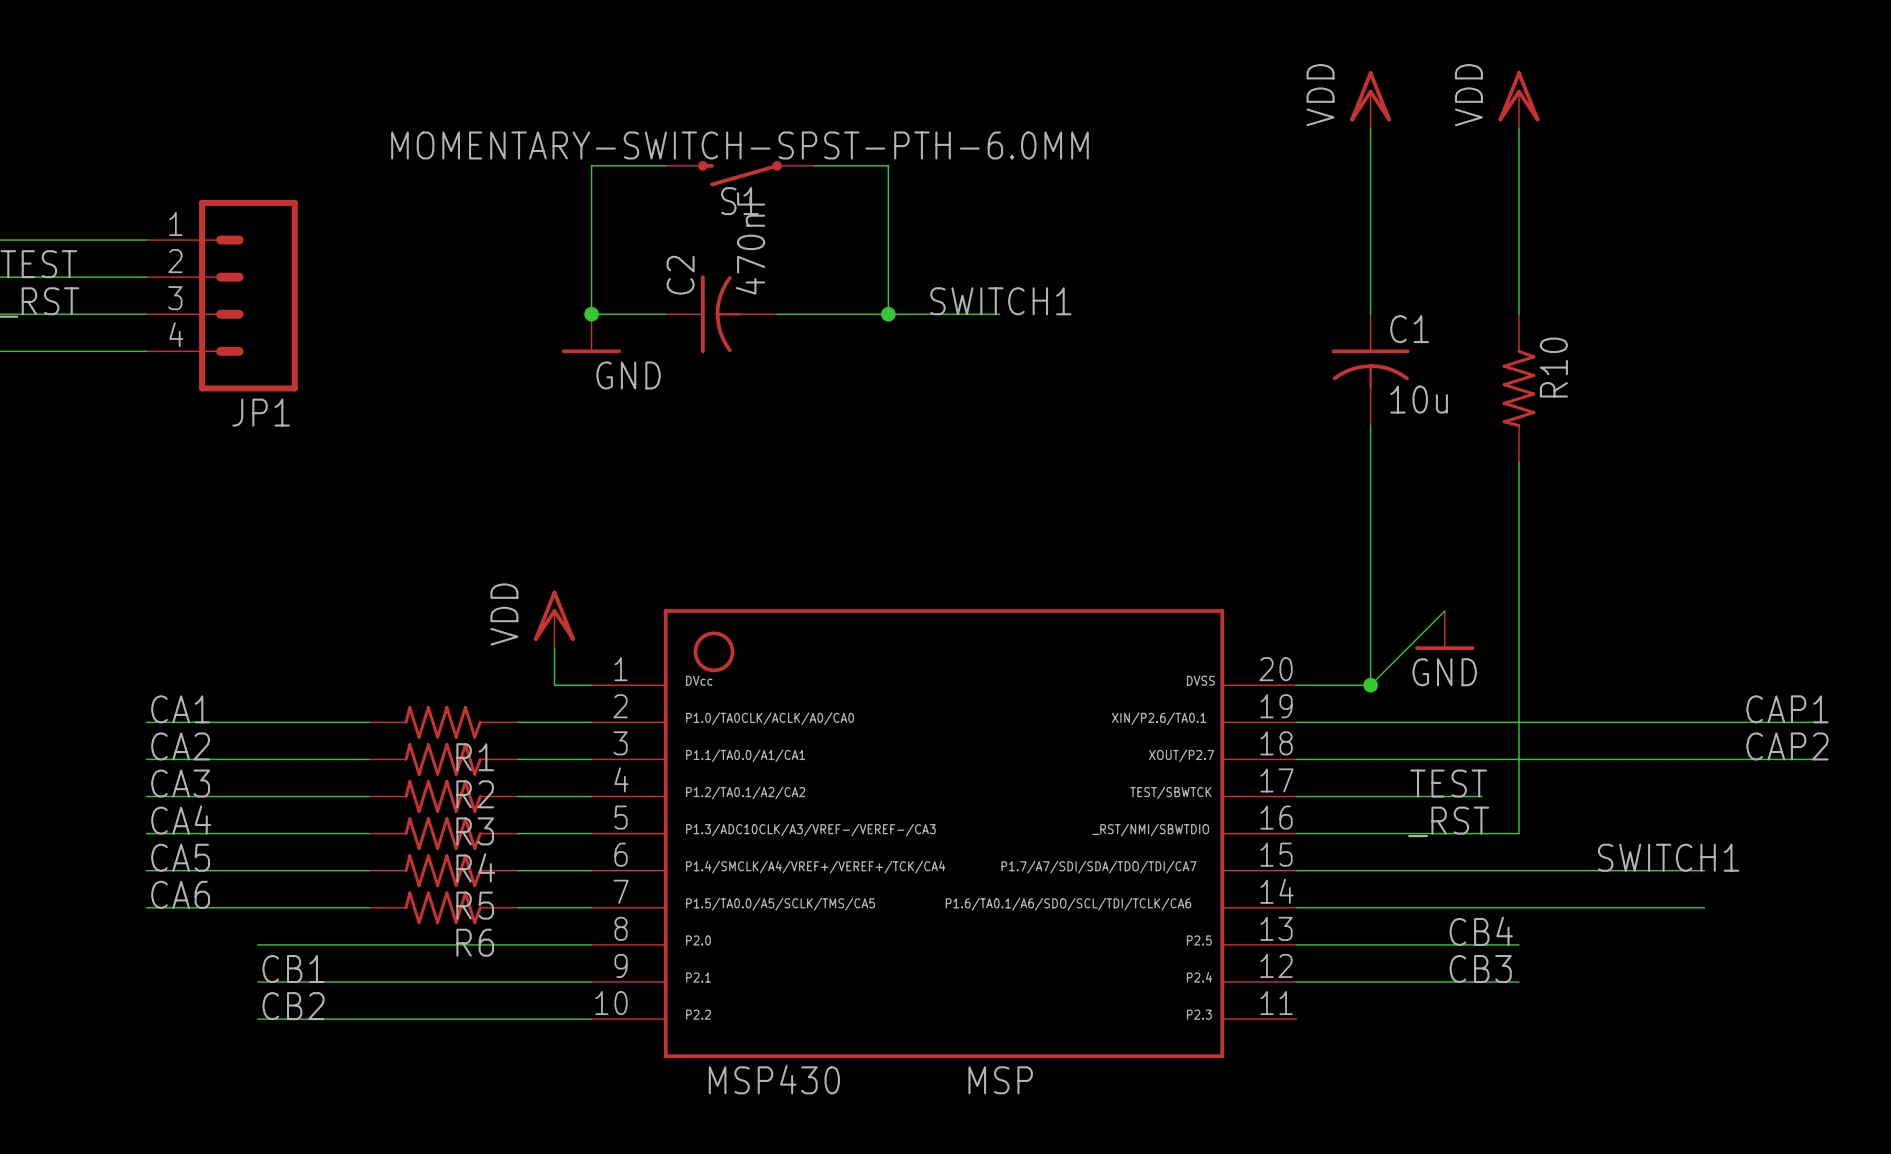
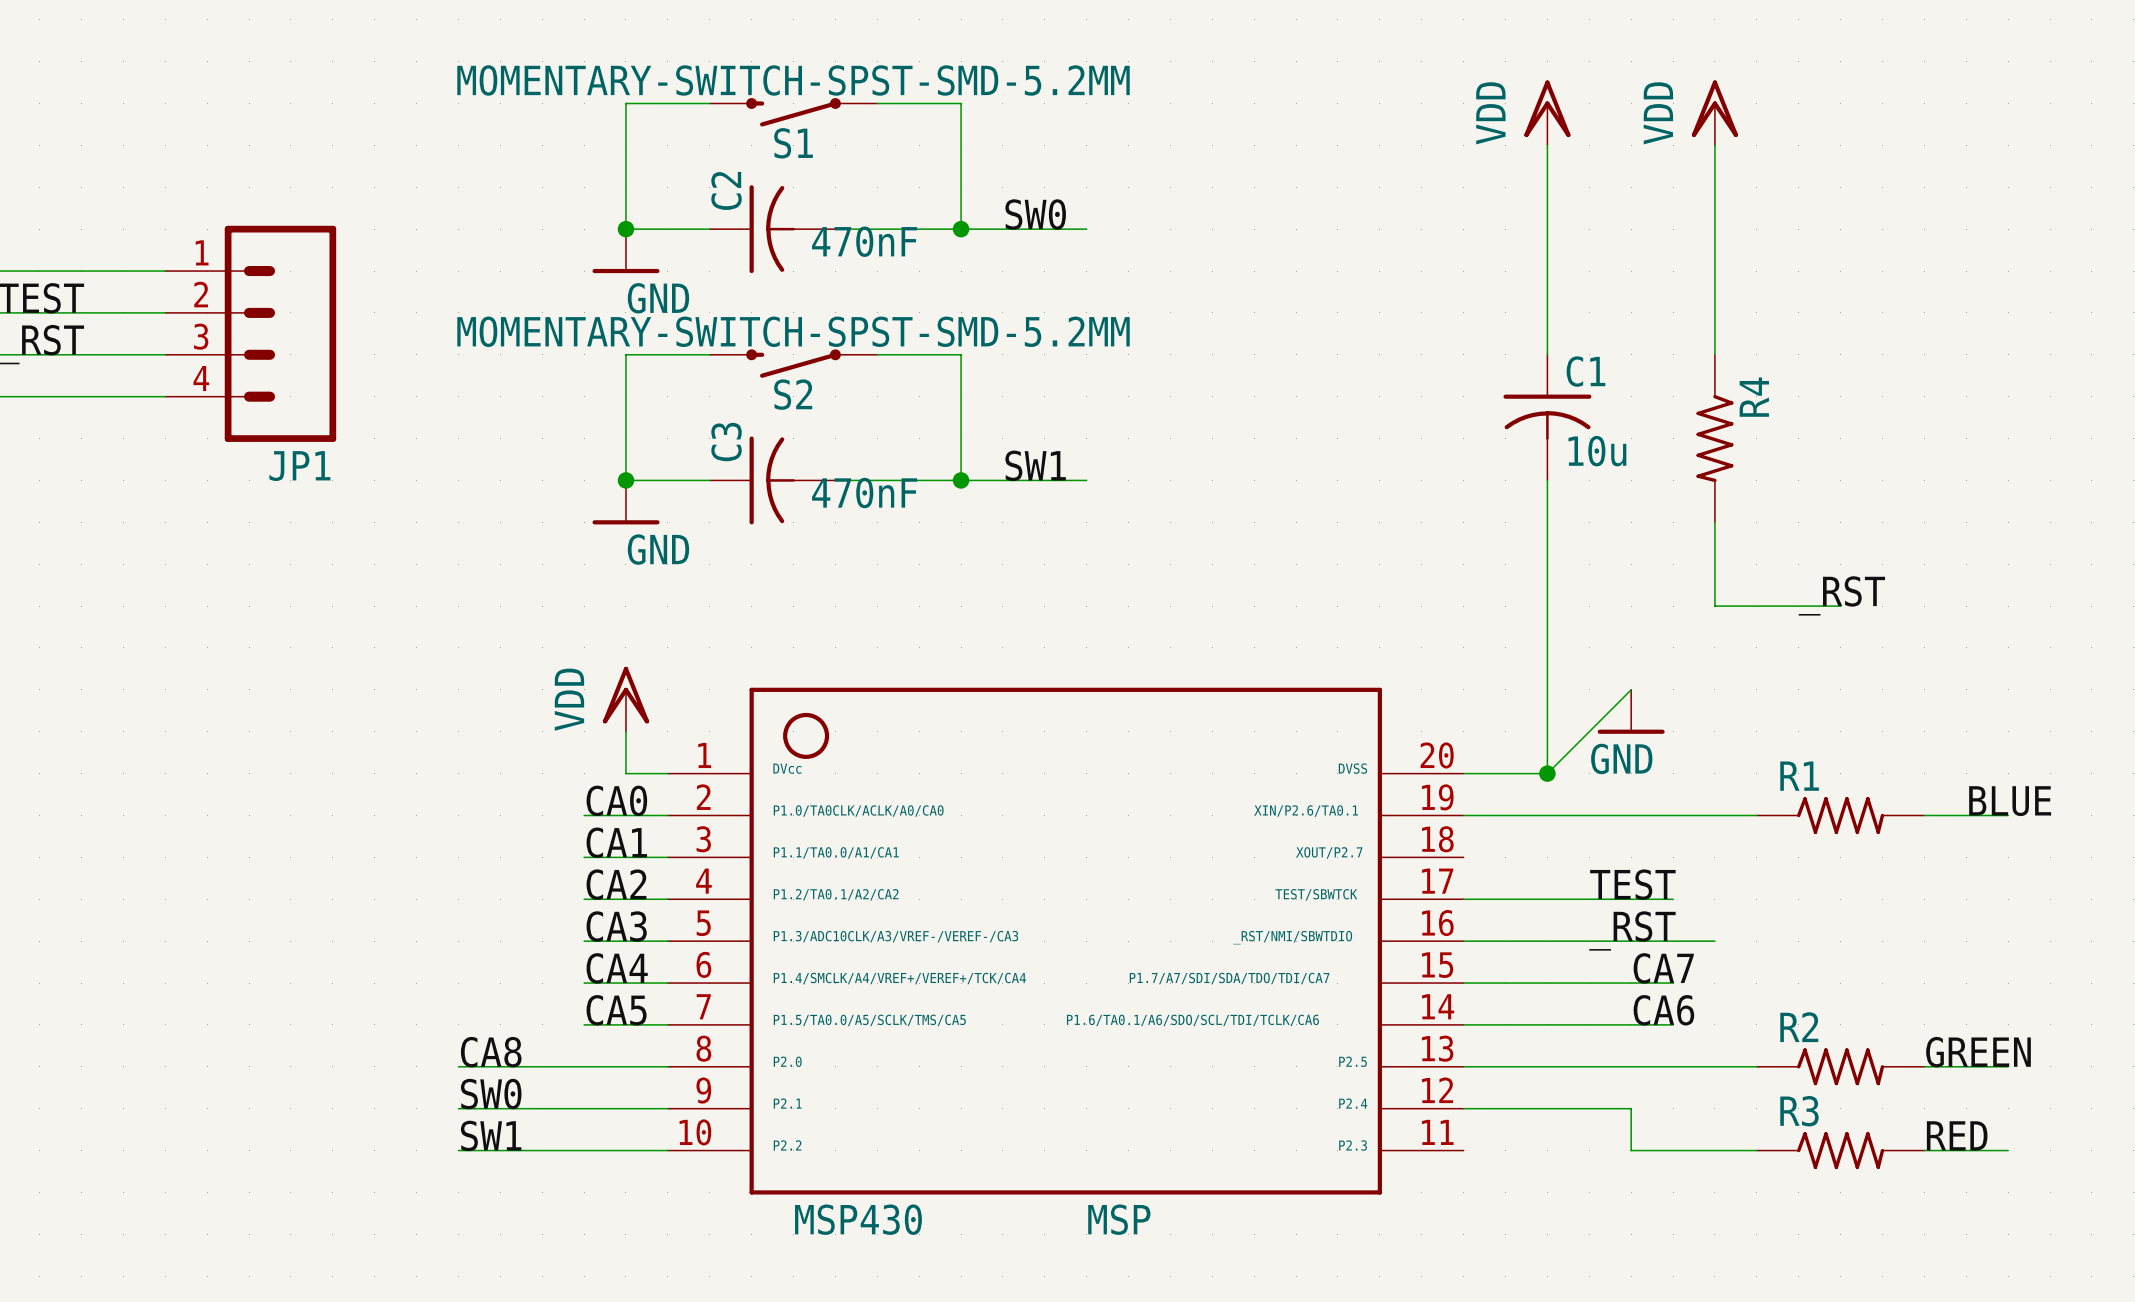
wire: none -> (709, 103) (625, 103) (625, 229) (709, 229)
wire: none -> (877, 103) (961, 103) (961, 229)
S1 value: MOMENTARY-SWITCH-SPST-PTH-6.0MM (739, 145) -> MOMENTARY-SWITCH-SPST-SMD-5.2MM (793, 80)
wire: (665, 165) (591, 165) (591, 314) -> (709, 480) (625, 480) (625, 354) (667, 354)
wire: (814, 165) (888, 165) (888, 314) -> none
S1 position: (739, 173) -> (793, 112)
label: none -> SW0 (1035, 214)
junction: none -> (625, 229)
wire: none -> (835, 229) (1086, 229)
junction: none -> (961, 229)
power symbol: none -> GND (625, 251)
C2 value rotation: 0° (750, 243) -> 90° clockwise (864, 241)
label: SWITCH1 (1000, 301) -> none
junction: (591, 314) -> none
C2 position: (721, 314) -> (772, 229)
wire: (851, 314) (999, 314) -> (961, 354) (961, 480)
junction: (888, 314) -> none
S2: none -> MOMENTARY-SWITCH-SPST-SMD-5.2MM (793, 363)
power symbol: GND (591, 333) -> none
R10 name: R10 (1553, 367) -> R4 (1754, 397)
label: none -> SW1 (1035, 465)
junction: none -> (625, 480)
C3: none -> 470nF (772, 480)
wire: none -> (835, 480) (1086, 480)
junction: none -> (961, 480)
power symbol: none -> GND (625, 502)
label: none -> _RST (1841, 595)
wire: (1519, 536) (1519, 833) -> (1714, 606) (1840, 606)
label: CA1 (180, 709) -> none
label: none -> CA0 (616, 800)
label: CAP1 (1787, 709) -> BLUE (2010, 801)
wire: (146, 722) (368, 722) -> none
R1 rotation: 0° (443, 722) -> 180° (1840, 815)
R1 position: (443, 722) -> (1840, 815)
wire: (1778, 722) (1815, 722) -> (1714, 1066) (1756, 1066)
label: CA2 (180, 746) -> none
label: none -> CA1 (616, 842)
label: CAP2 (1787, 746) -> none
wire: (146, 759) (368, 759) -> none
R2 rotation: 0° (443, 759) -> 180° (1840, 1066)
R2 position: (443, 759) -> (1840, 1066)
wire: (1296, 759) (1815, 759) -> none
label: CA3 (180, 783) -> none
label: none -> CA2 (616, 884)
wire: (146, 796) (368, 796) -> none
R3 rotation: 0° (443, 796) -> 180° (1840, 1150)
R3 position: (443, 796) -> (1840, 1150)
label: CA4 (181, 820) -> none
label: none -> CA3 (616, 926)
wire: (146, 833) (368, 833) -> none
R4: (443, 833) -> none
label: CA5 (180, 857) -> none
label: none -> CA4 (617, 968)
label: none -> CA7 (1663, 968)
label: SWITCH1 (1668, 857) -> none
wire: (146, 870) (368, 870) -> none
R5: (443, 870) -> none
wire: (1481, 870) (1704, 870) -> none
label: CA6 (180, 894) -> none
label: none -> CA5 (616, 1010)
label: none -> CA6 (1663, 1010)
wire: (146, 907) (368, 907) -> none
R6: (443, 907) -> none
wire: (1481, 907) (1704, 907) -> none
label: none -> CA8 (491, 1052)
label: CB4 (1481, 931) -> none
label: none -> GREEN (1978, 1052)
wire: (257, 944) (406, 944) -> none
wire: none -> (1924, 1066) (2008, 1066)
label: CB1 (293, 969) -> none
label: none -> SW0 (491, 1094)
label: CB3 (1480, 969) -> none
wire: (257, 982) (406, 982) -> none
wire: (1444, 982) (1519, 982) -> (1631, 1108) (1631, 1150) (1756, 1150)
label: CB2 (293, 1006) -> none
label: none -> SW1 (491, 1135)
label: none -> RED (1957, 1135)
wire: (257, 1019) (406, 1019) -> none
wire: none -> (1924, 1150) (2008, 1150)

